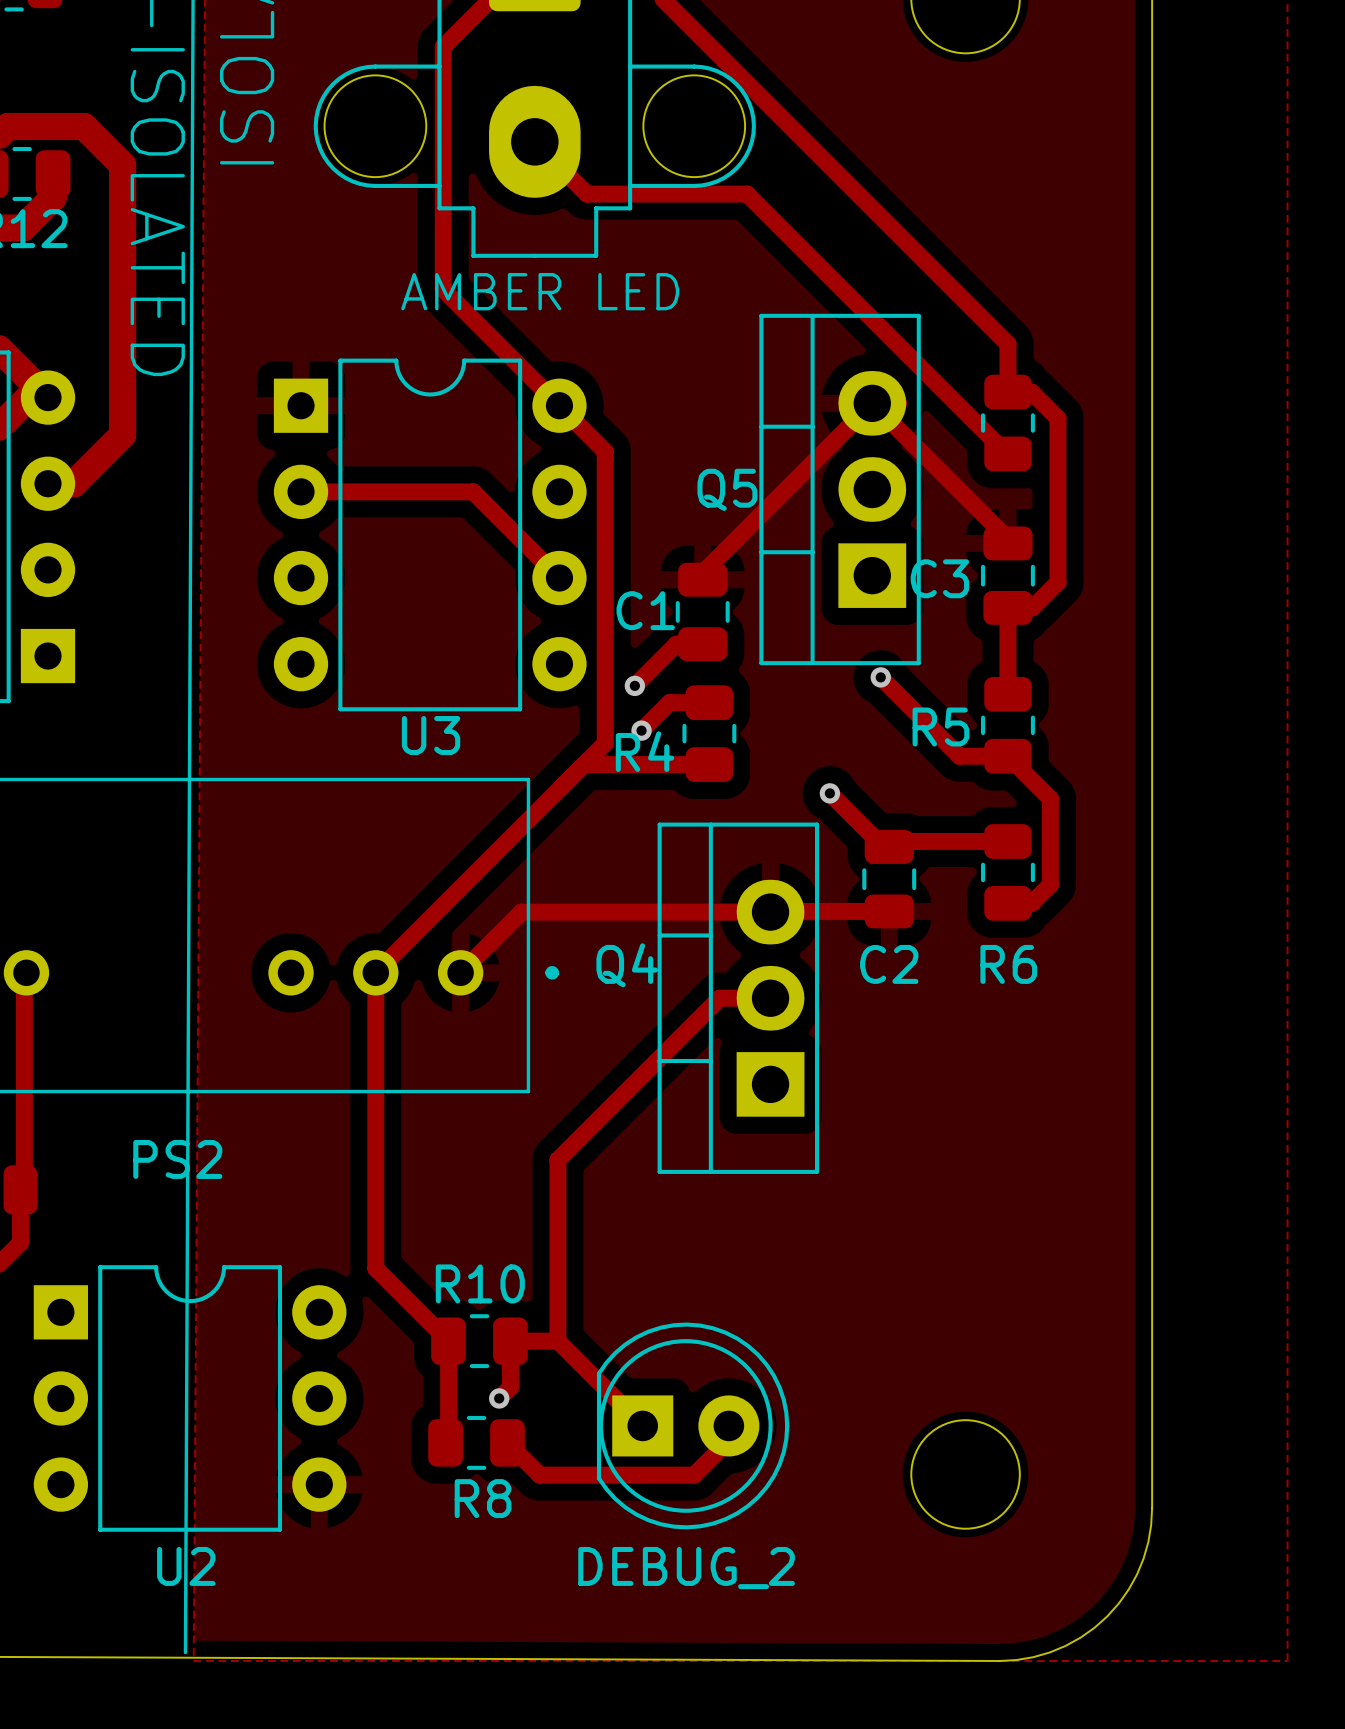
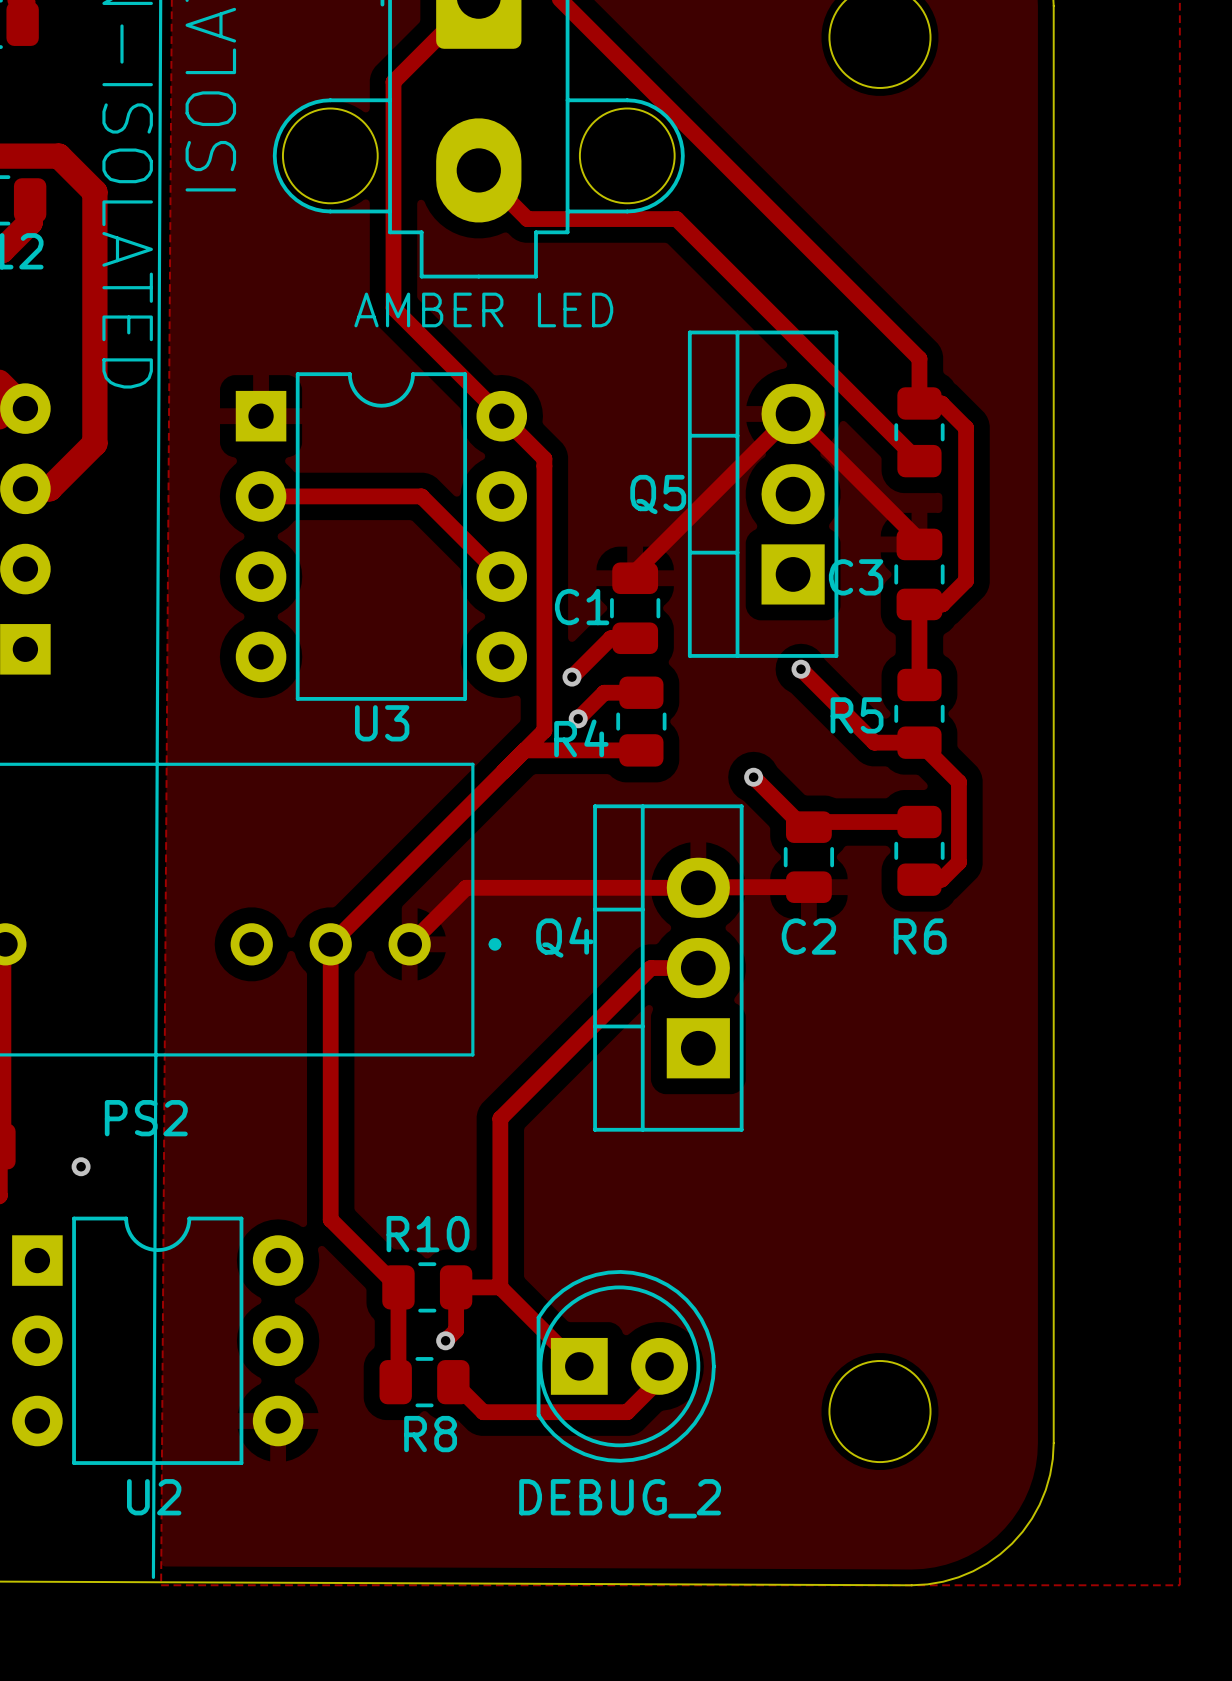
via: none -> (81, 1166)

